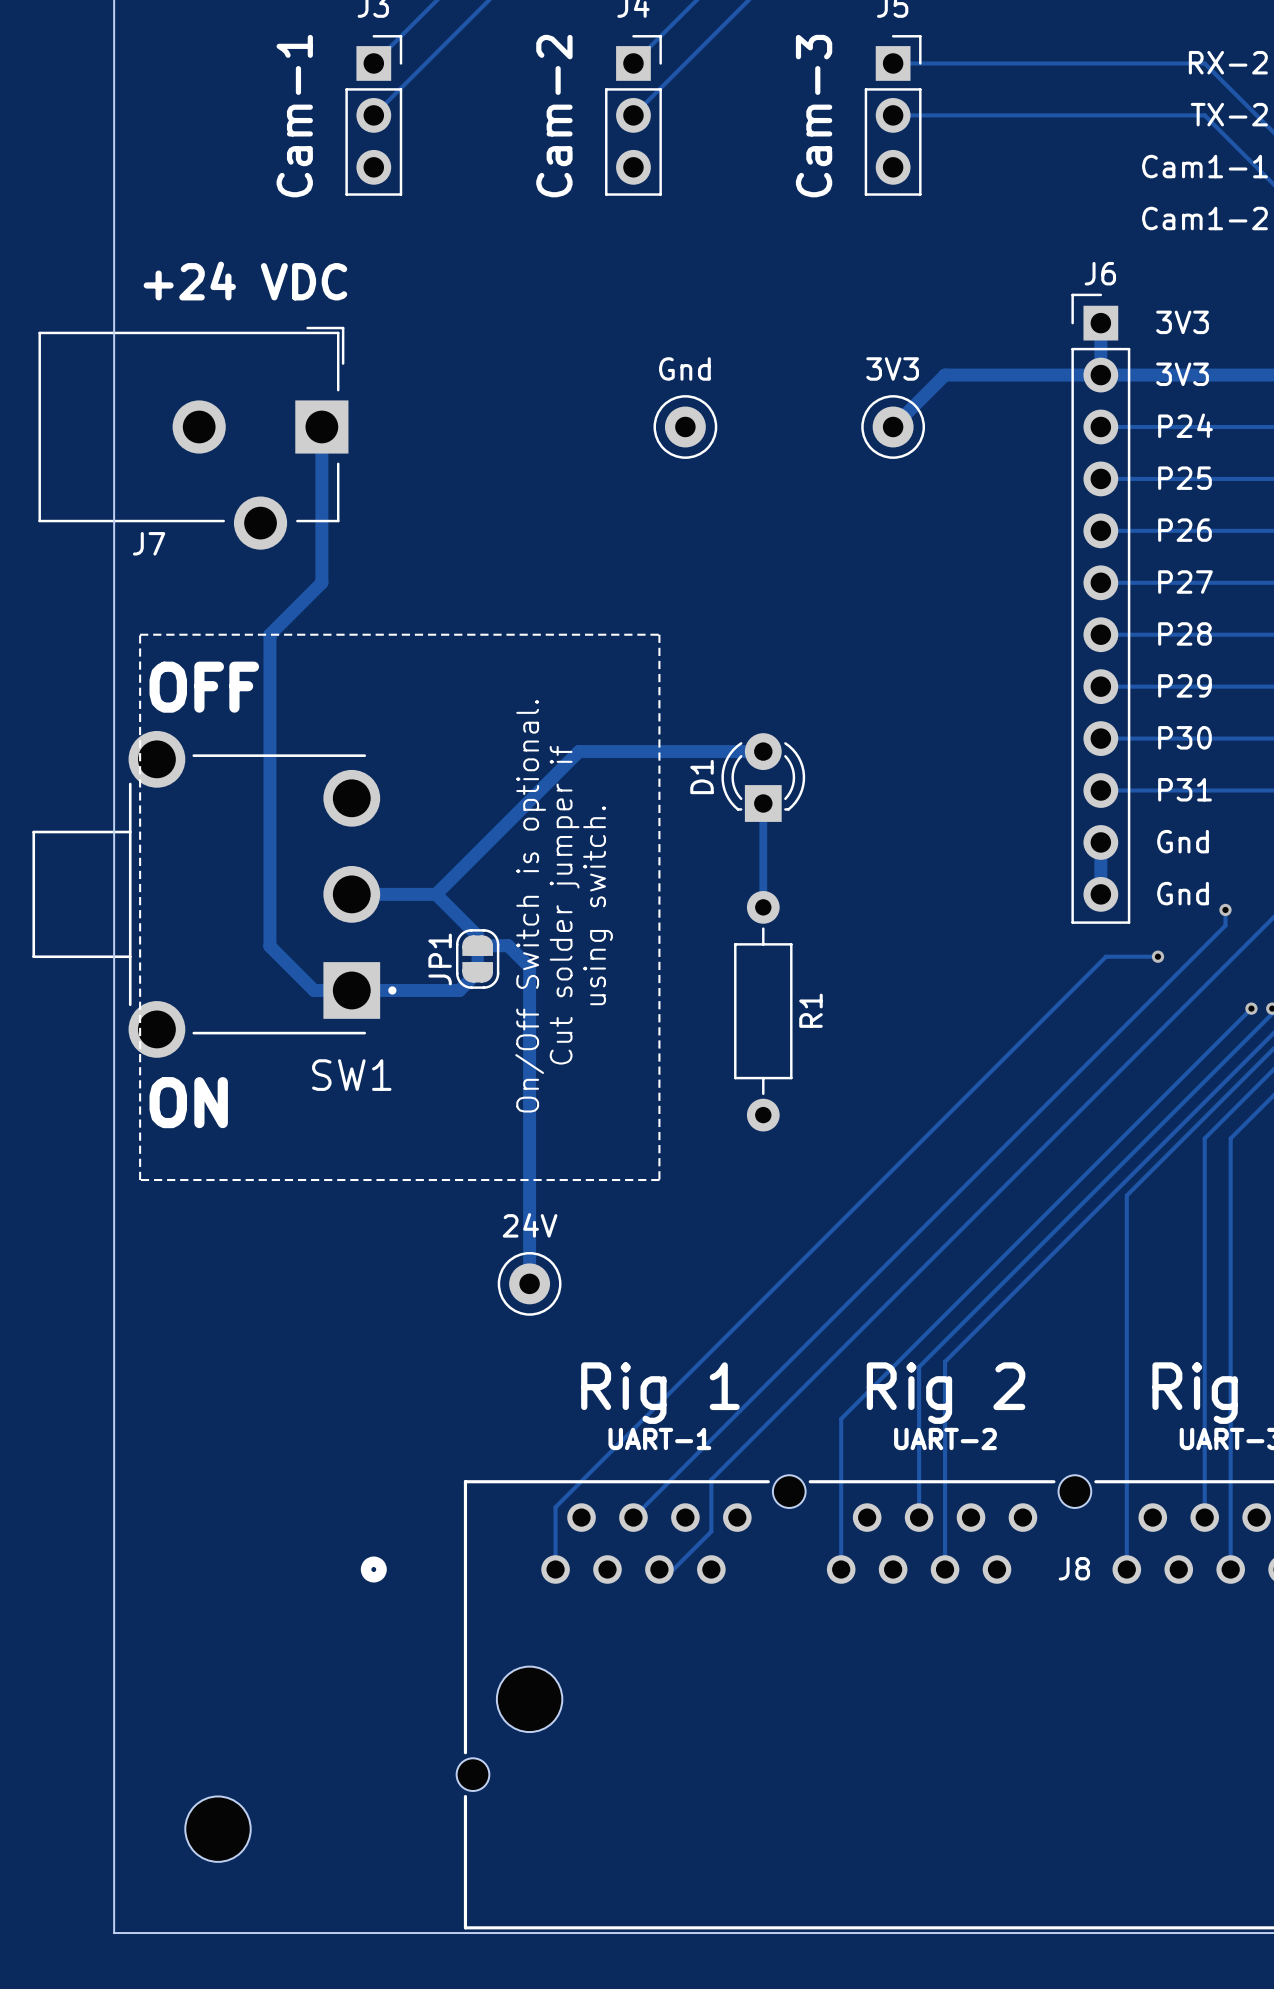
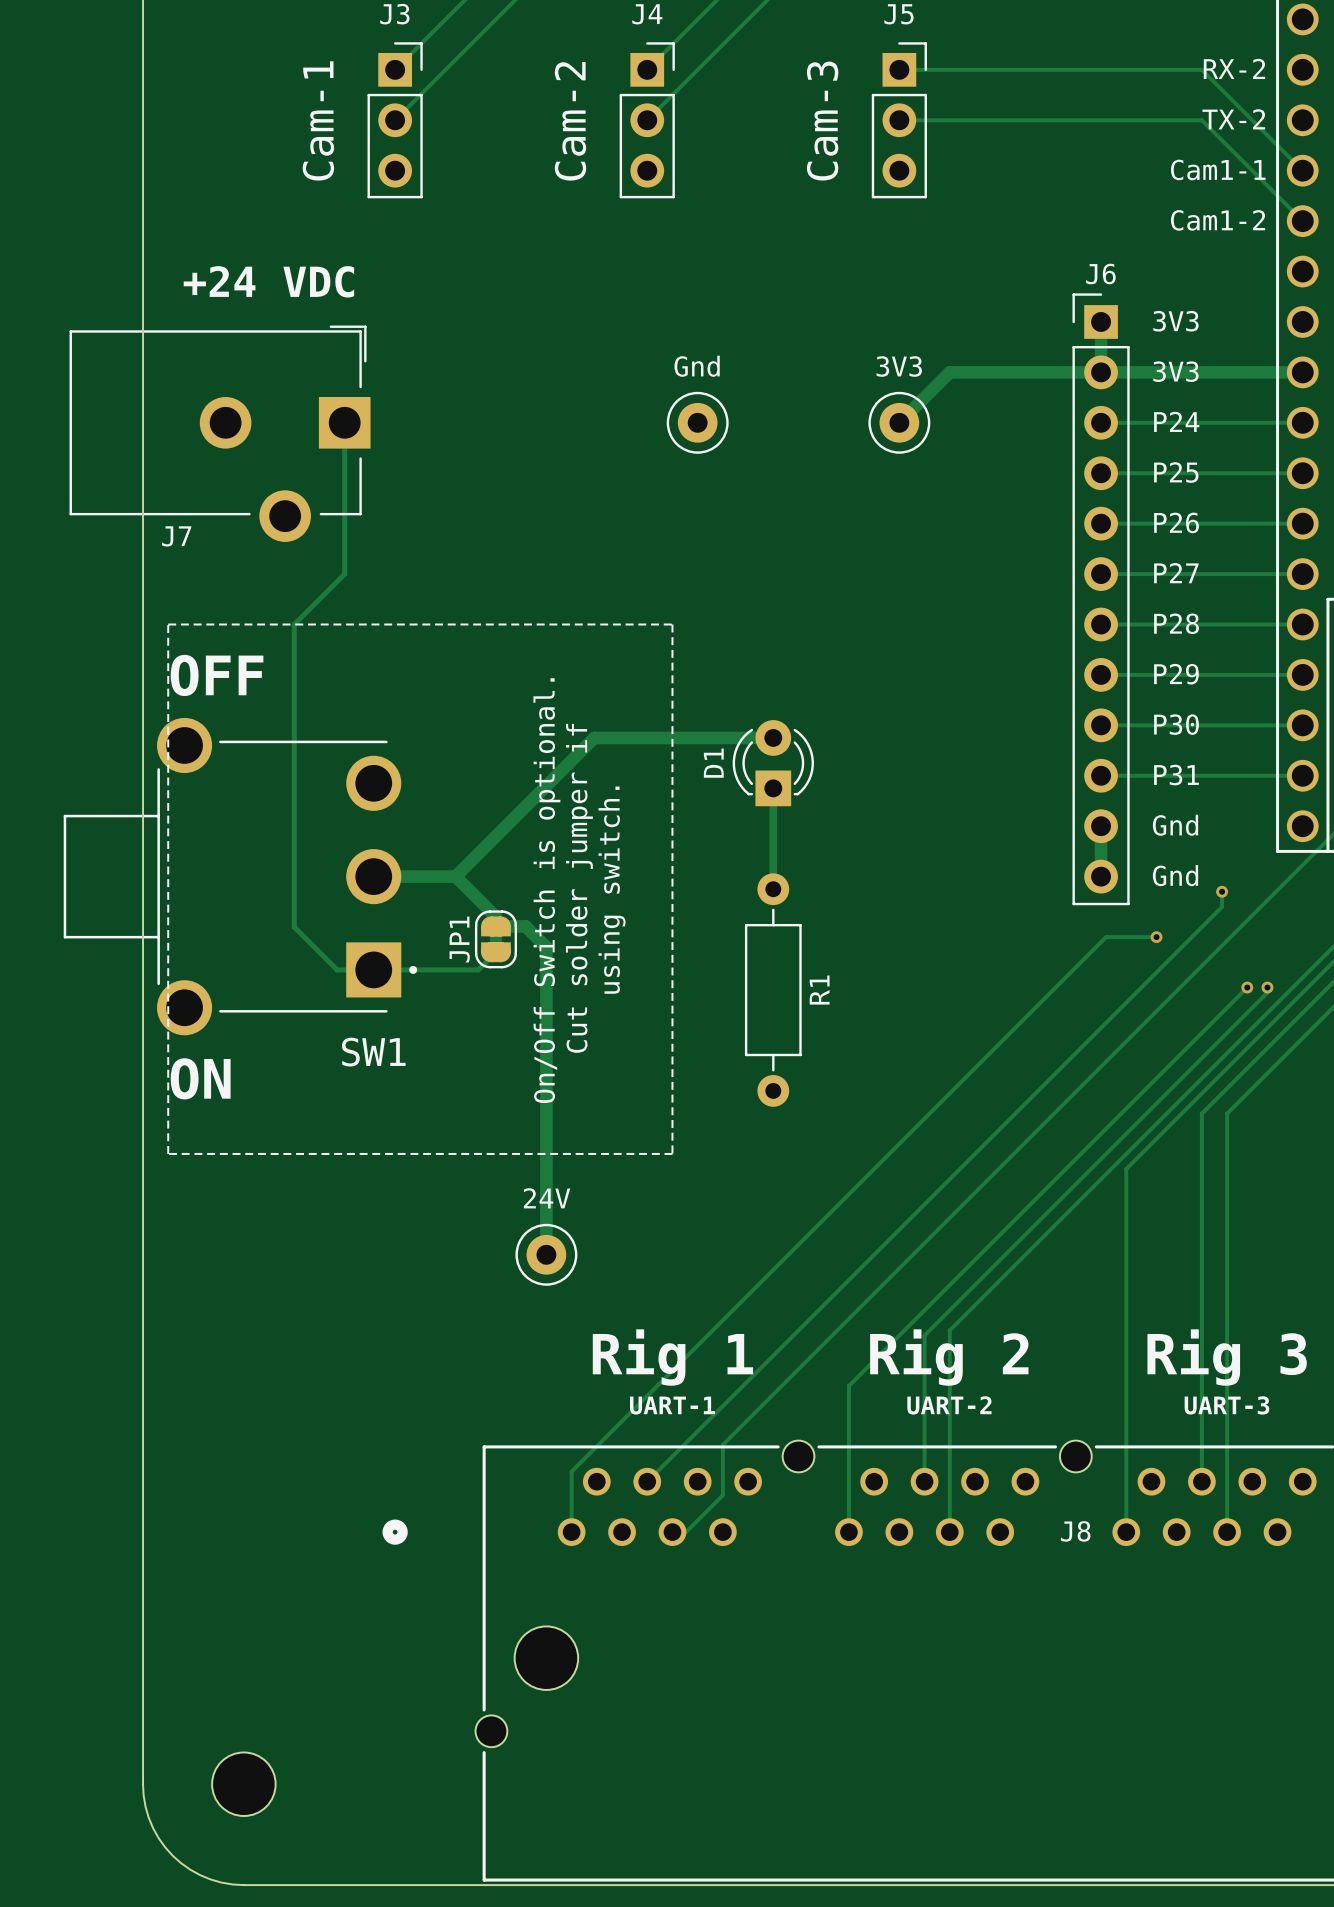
track width: thick (321, 426) (321, 582) (269, 634) (269, 946) (314, 990) (459, 990) (477, 972) -> thin (344, 422) (344, 574) (294, 624) (294, 927) (337, 969) (478, 969) (495, 952)
board edge: (114, 1829) (114, 1933) (218, 1933) -> (143, 1784) (145, 1806) (153, 1828) (172, 1855) (200, 1875) (221, 1882) (243, 1885)

